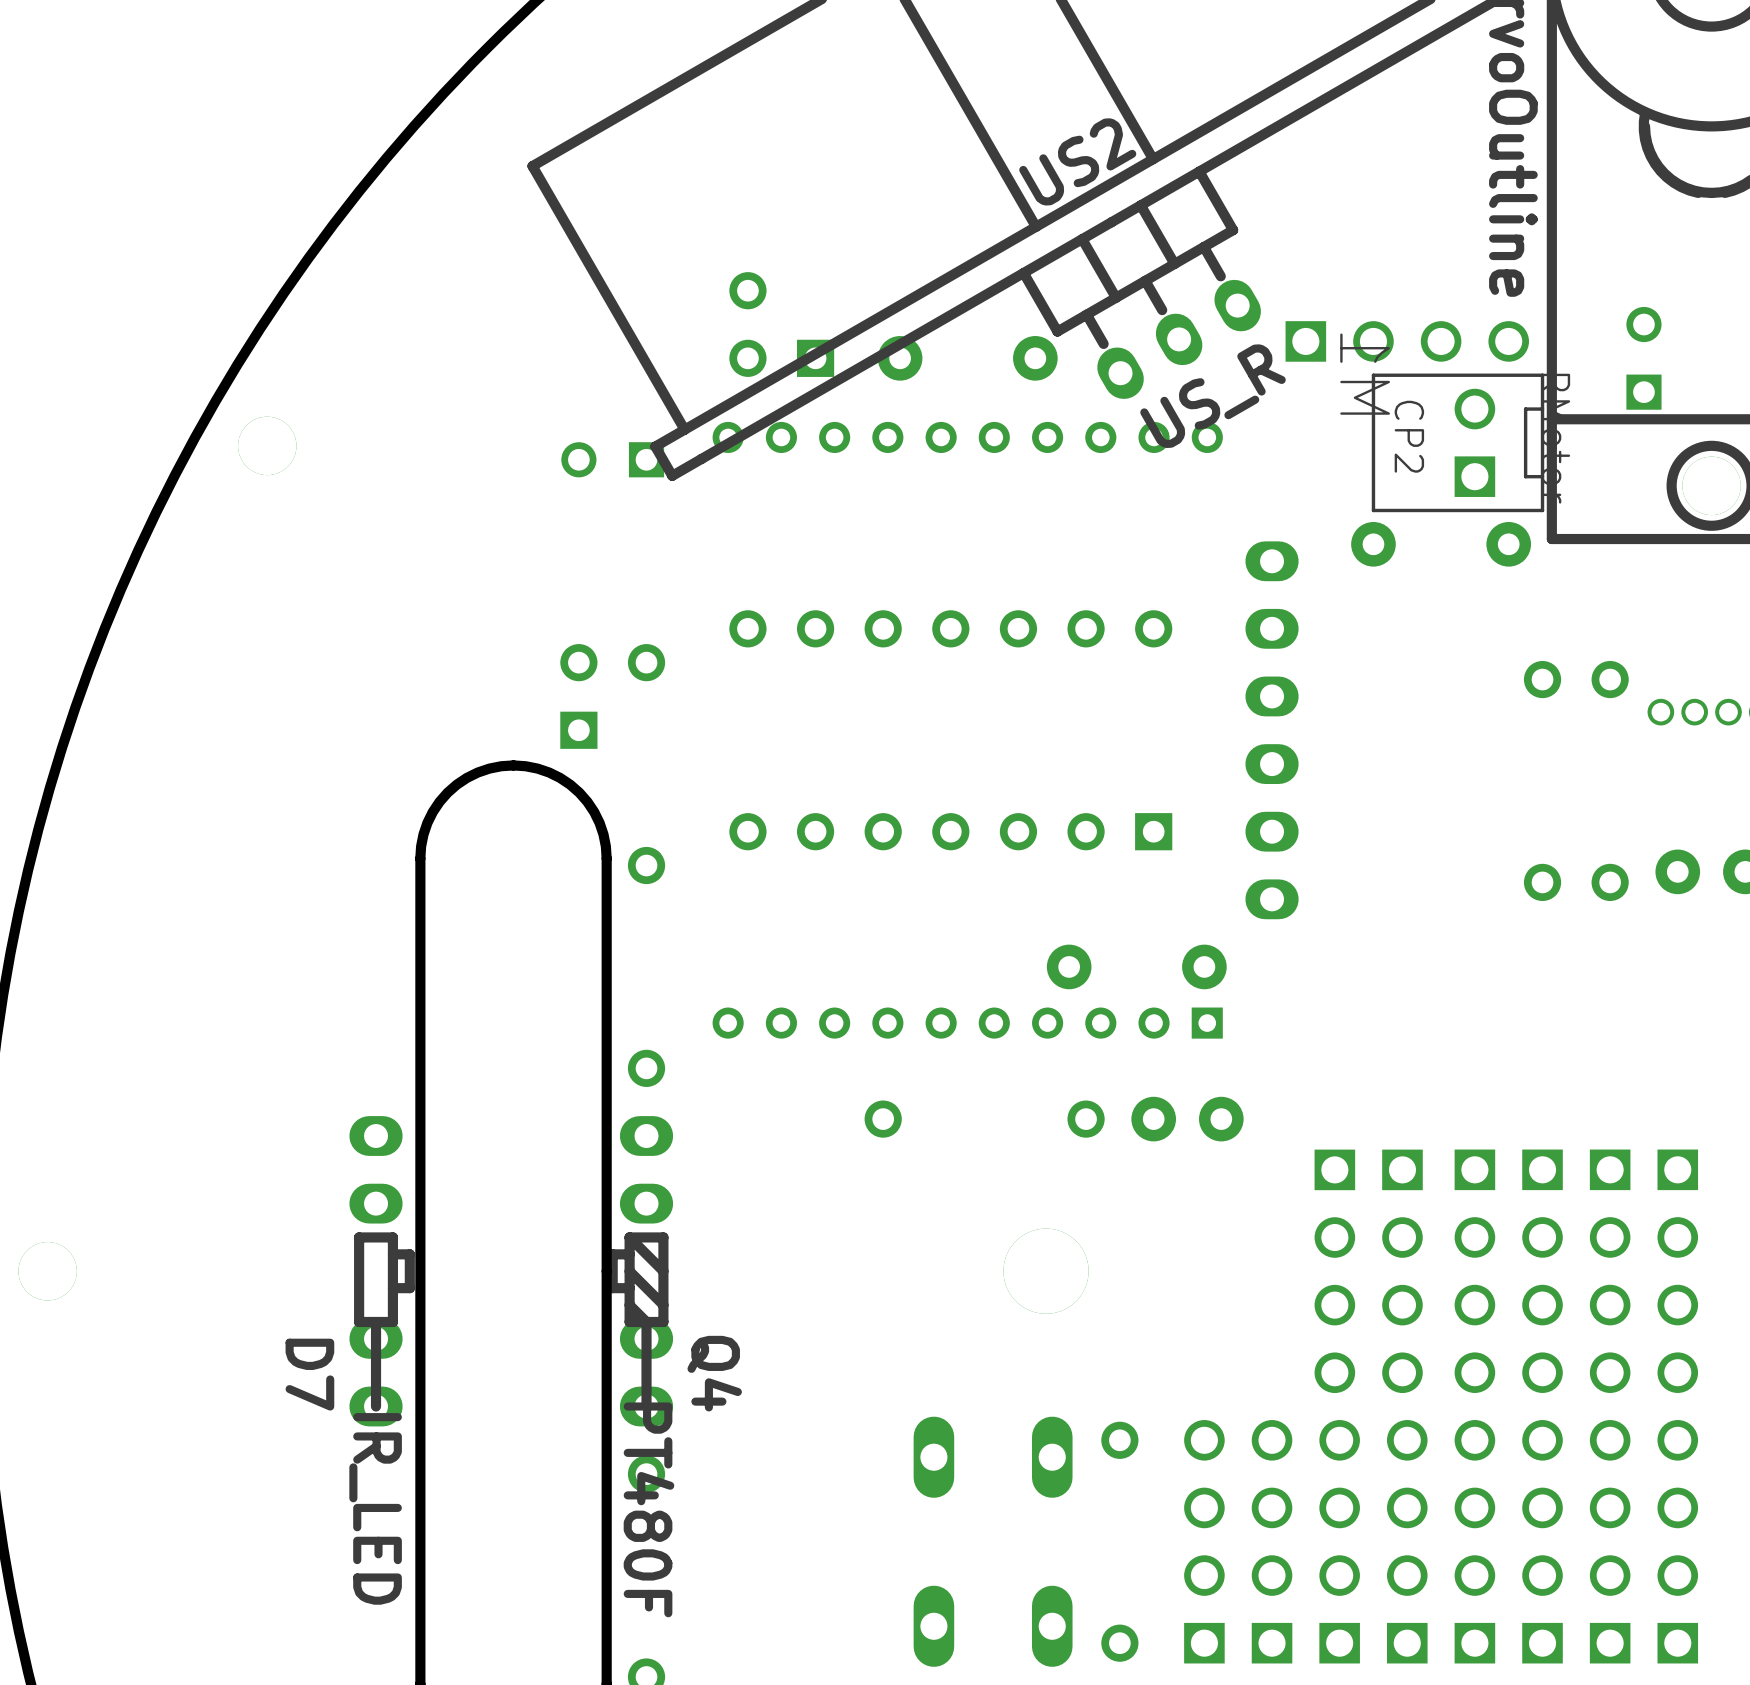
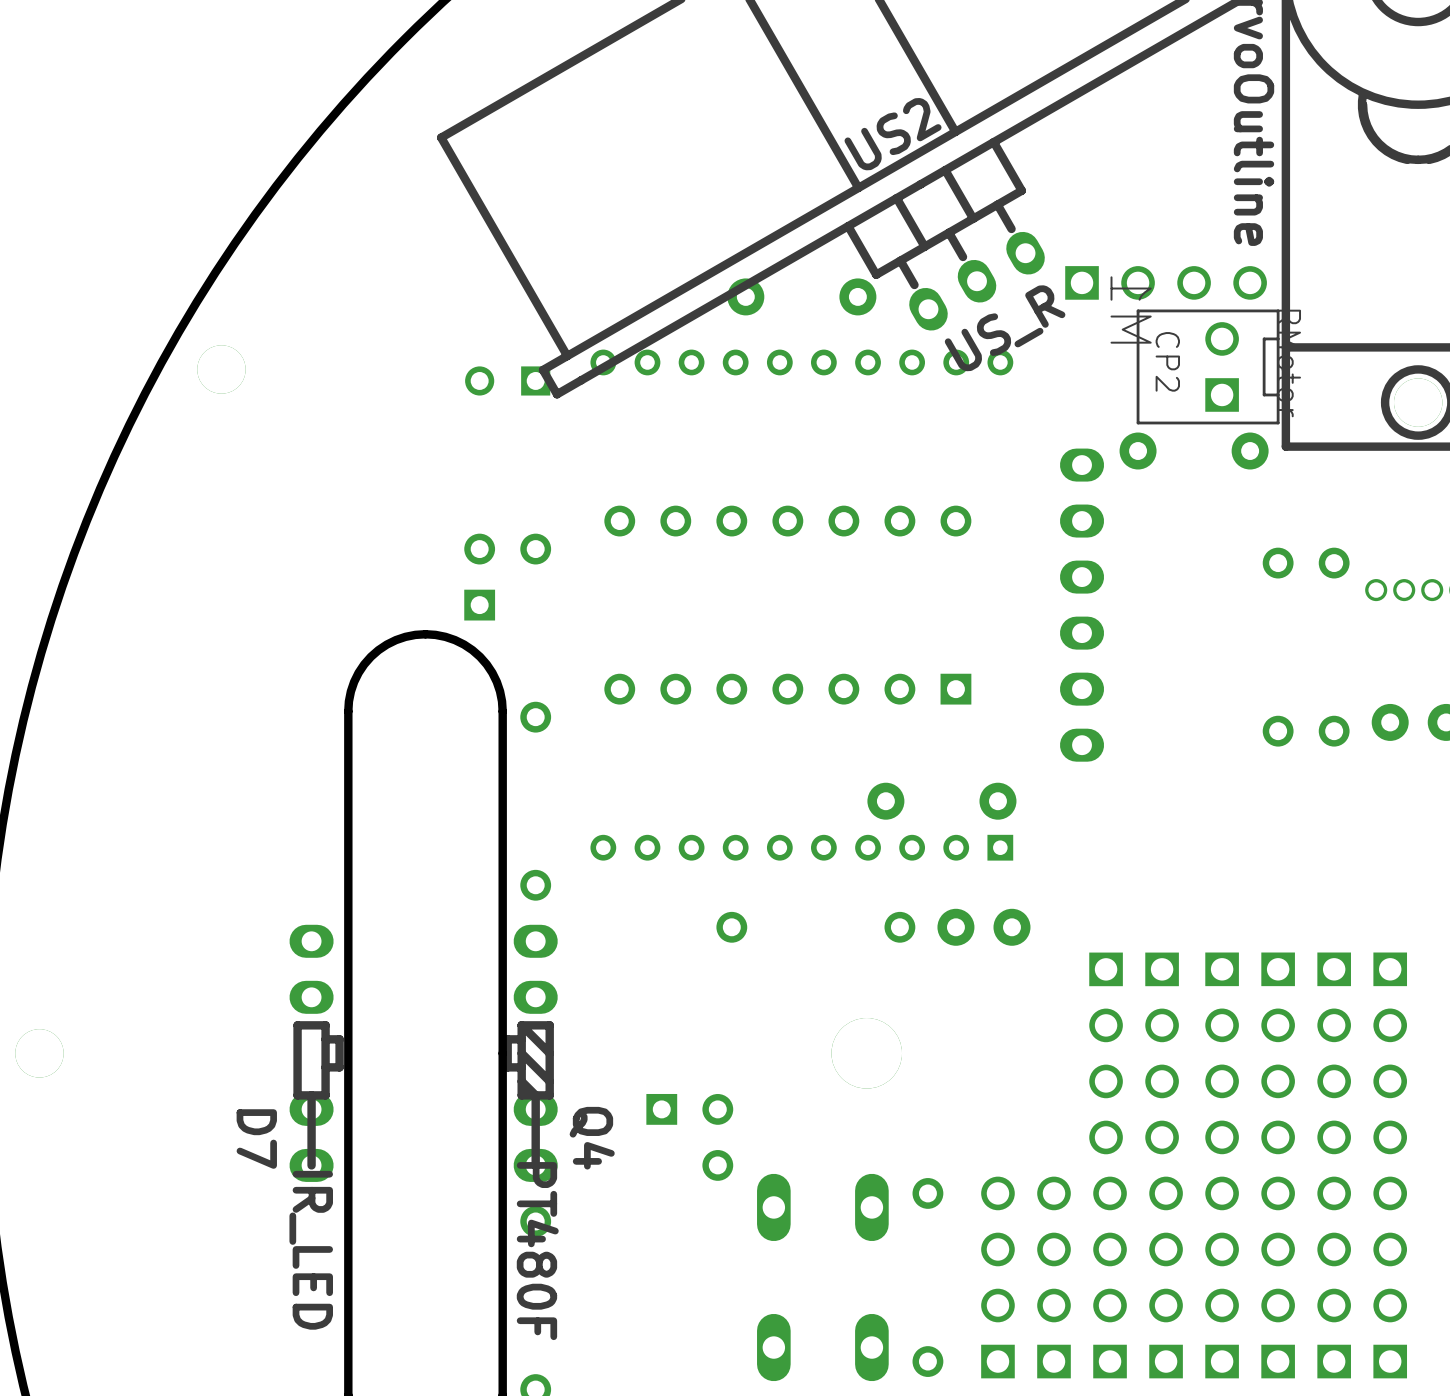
part: (781, 324) -> none
part: (1643, 358) -> none
part position: (1272, 730) -> (1082, 605)
part: none -> (689, 1137)

